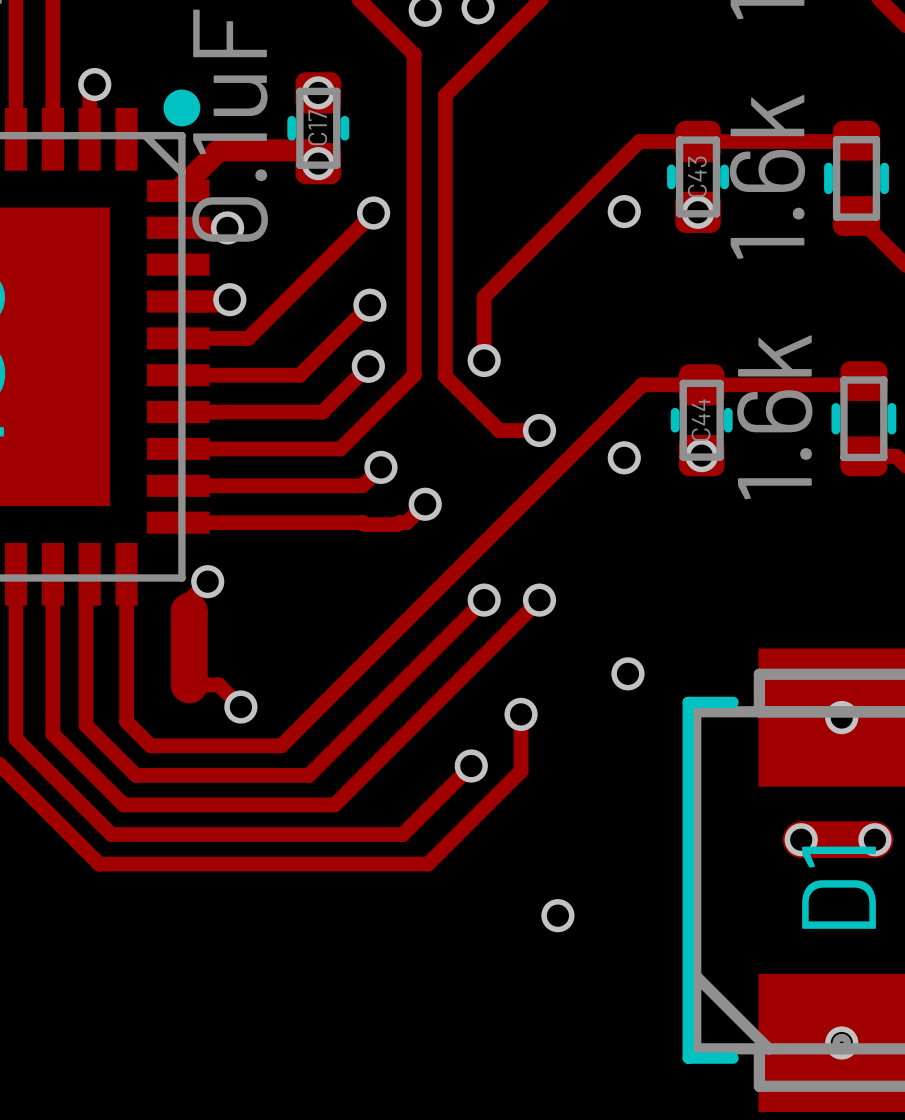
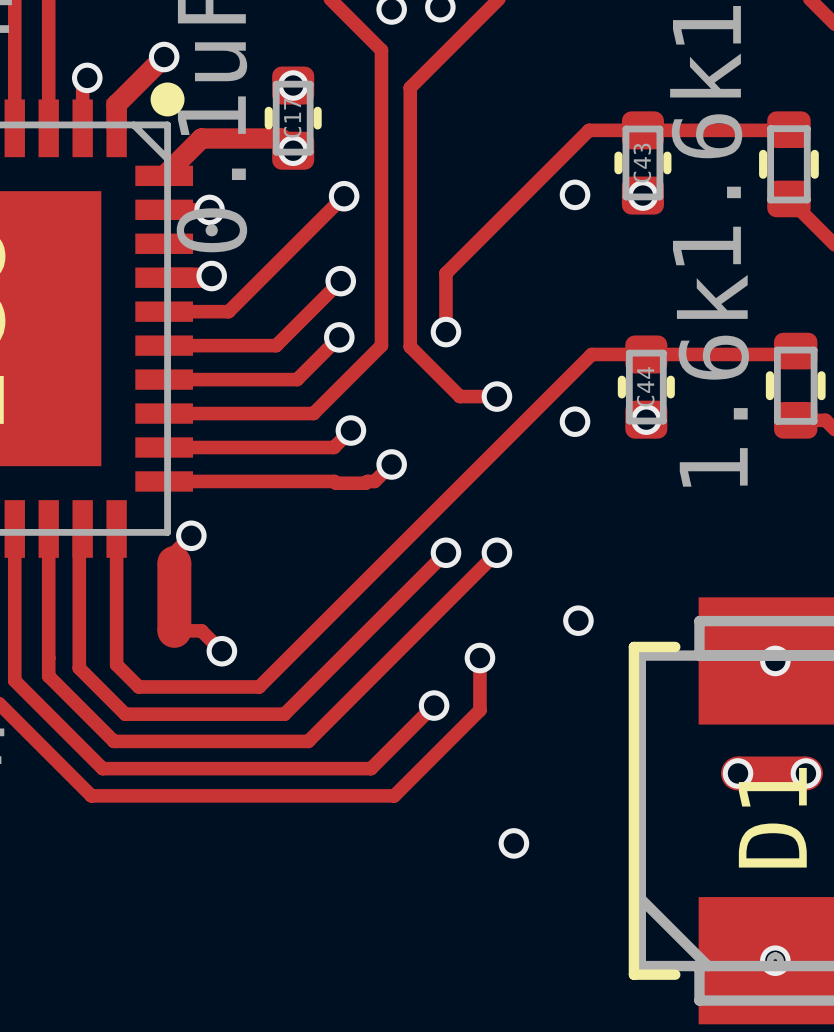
track: none -> (164, 57) (116, 104) (116, 128)
via: none -> (164, 57)

